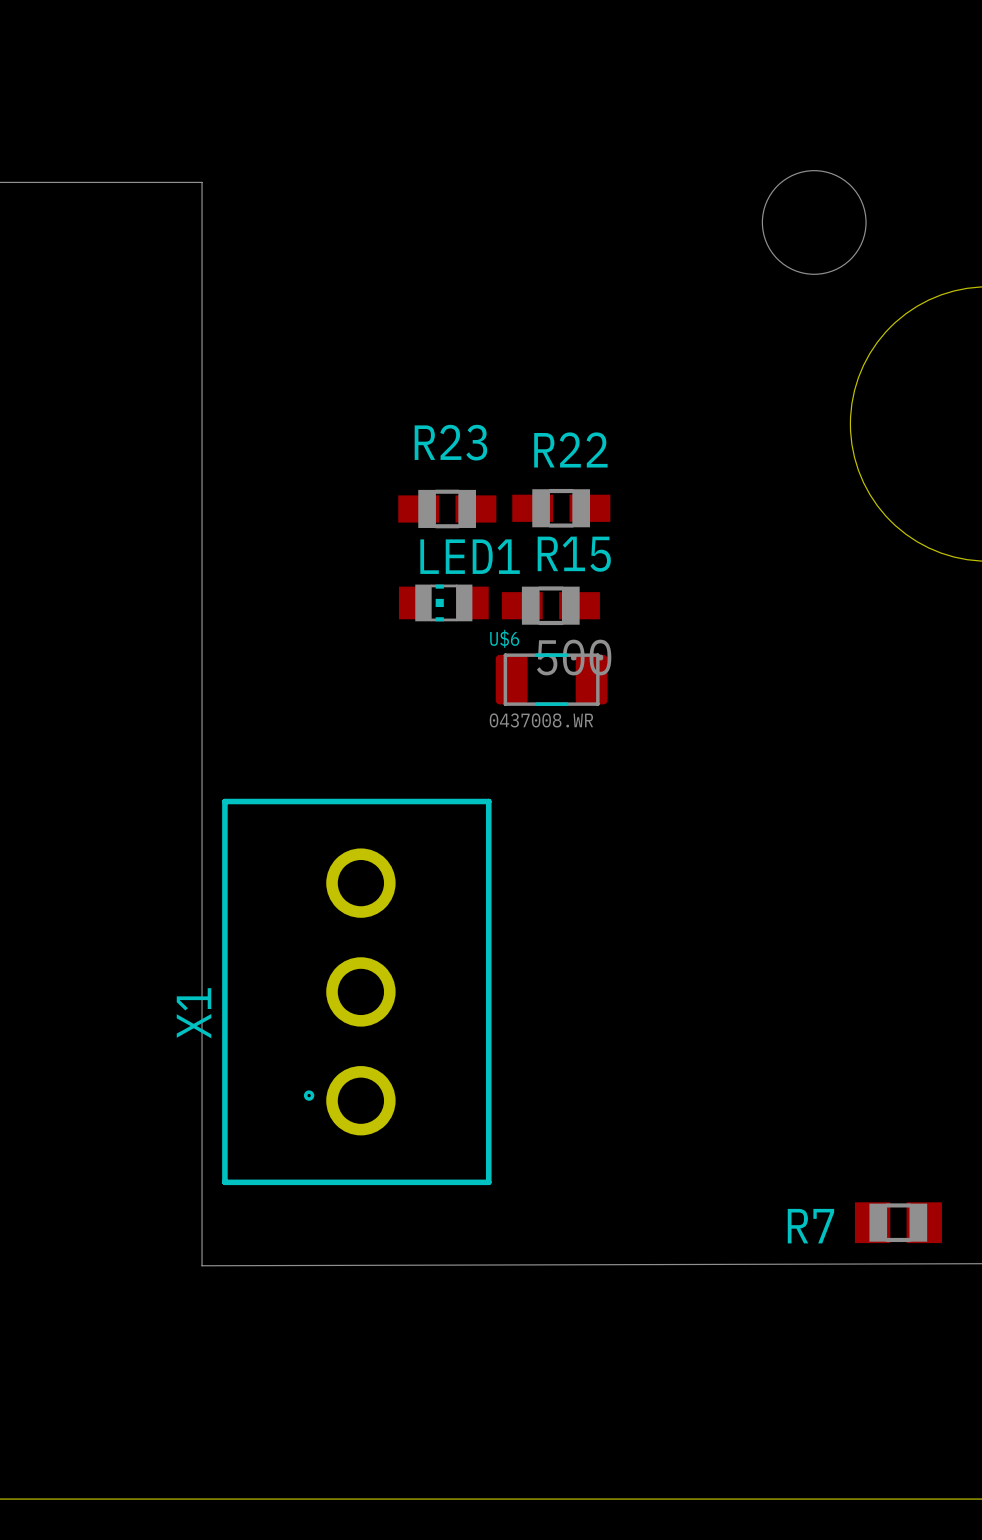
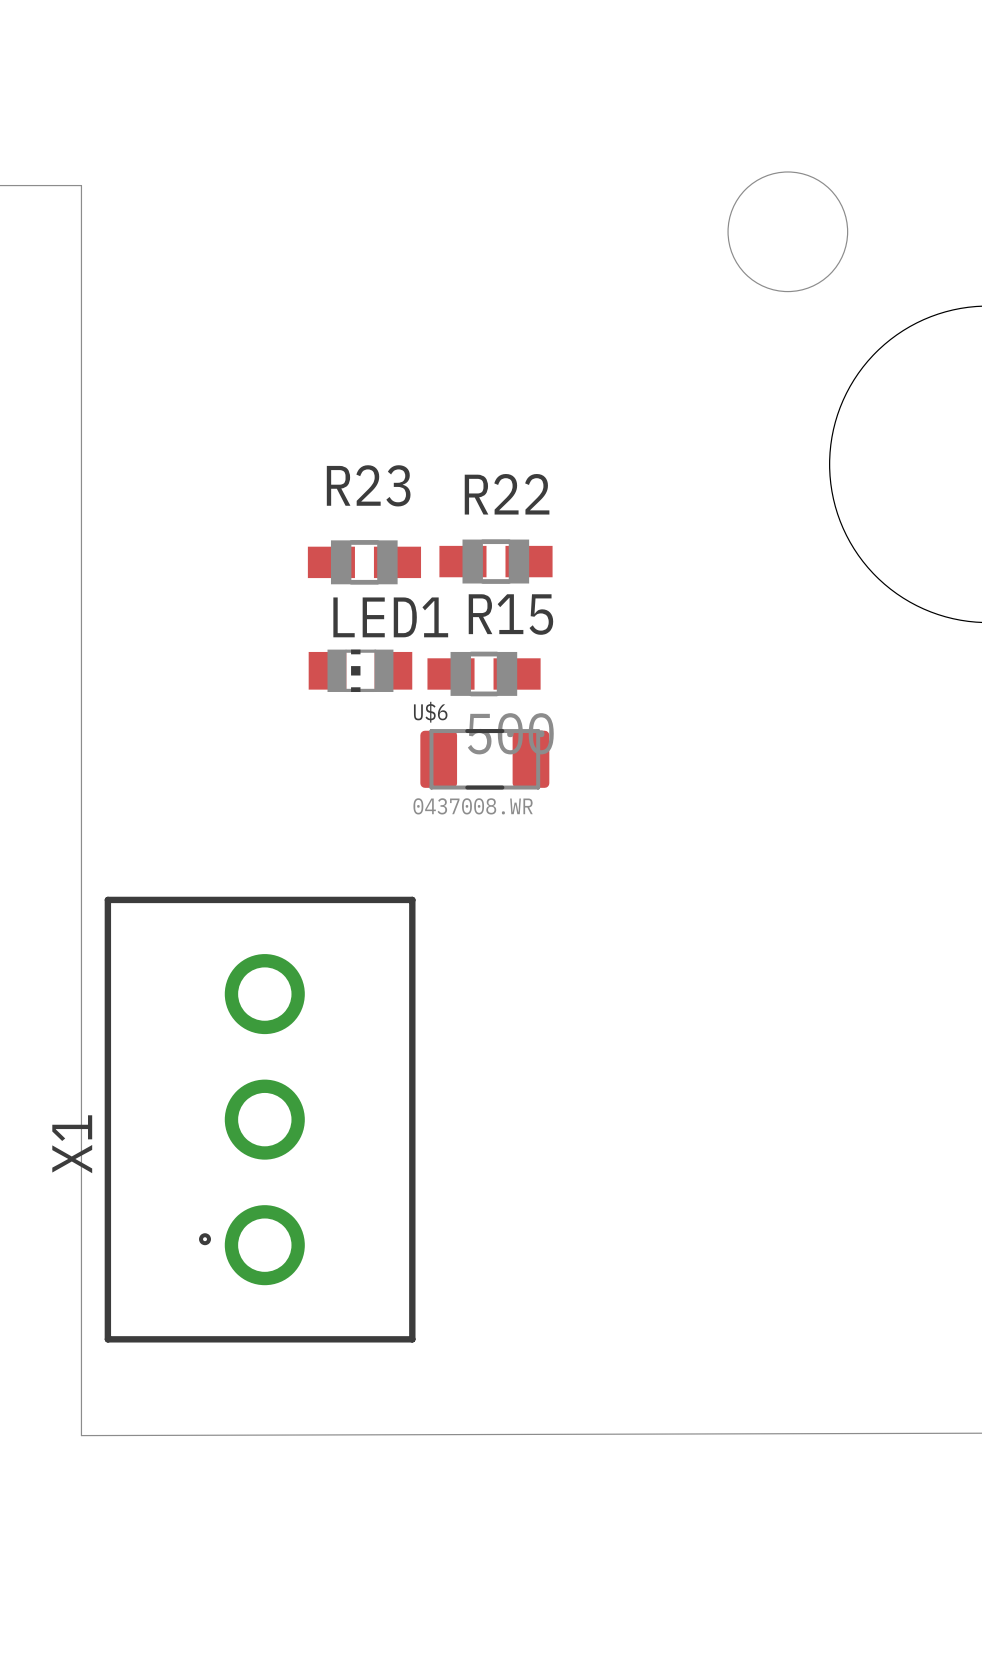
R7: (898, 1222) -> none

